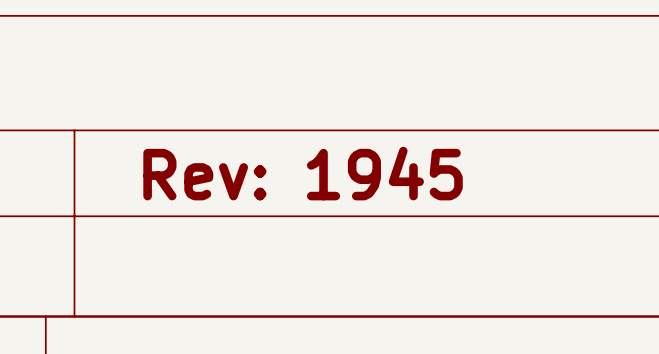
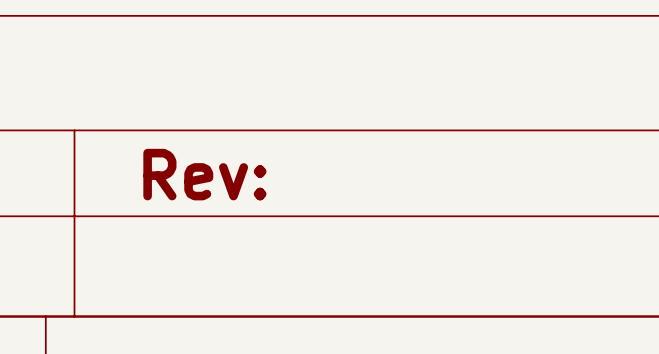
title block: Rev: 1945 (303, 173) -> Rev: (204, 174)

